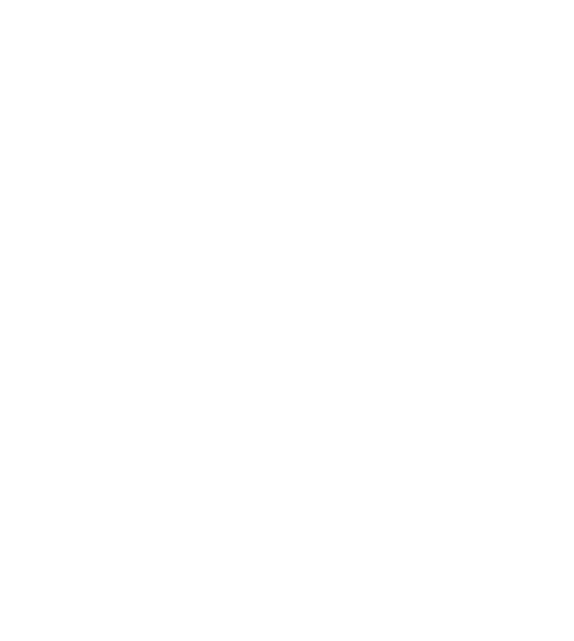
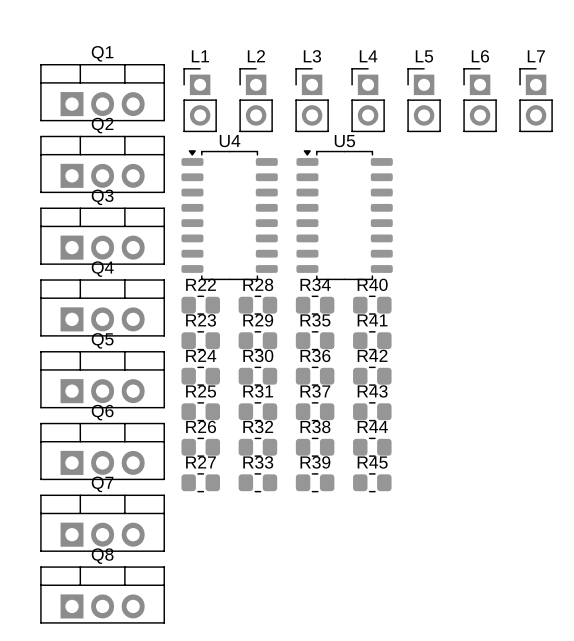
Q1: none -> (102, 92)
L1: none -> (200, 100)
L2: none -> (256, 100)
L3: none -> (312, 100)
L4: none -> (368, 100)
L5: none -> (424, 100)
L6: none -> (480, 100)
L7: none -> (536, 100)
Q2: none -> (102, 164)
U4: none -> (229, 215)
U5: none -> (344, 215)
Q3: none -> (102, 236)
R22: none -> (200, 305)
R28: none -> (257, 305)
R34: none -> (315, 305)
R40: none -> (372, 305)
Q4: none -> (102, 307)
R23: none -> (200, 340)
R29: none -> (257, 340)
R35: none -> (315, 340)
R41: none -> (372, 340)
R24: none -> (200, 376)
R30: none -> (257, 376)
R36: none -> (315, 376)
R42: none -> (372, 376)
Q5: none -> (102, 379)
R25: none -> (200, 411)
R31: none -> (257, 411)
R37: none -> (315, 411)
R43: none -> (372, 411)
R26: none -> (200, 447)
R32: none -> (257, 447)
R38: none -> (315, 447)
R44: none -> (372, 447)
Q6: none -> (102, 451)
R27: none -> (200, 482)
R33: none -> (257, 482)
R39: none -> (315, 482)
R45: none -> (372, 482)
Q7: none -> (102, 523)
Q8: none -> (102, 595)

